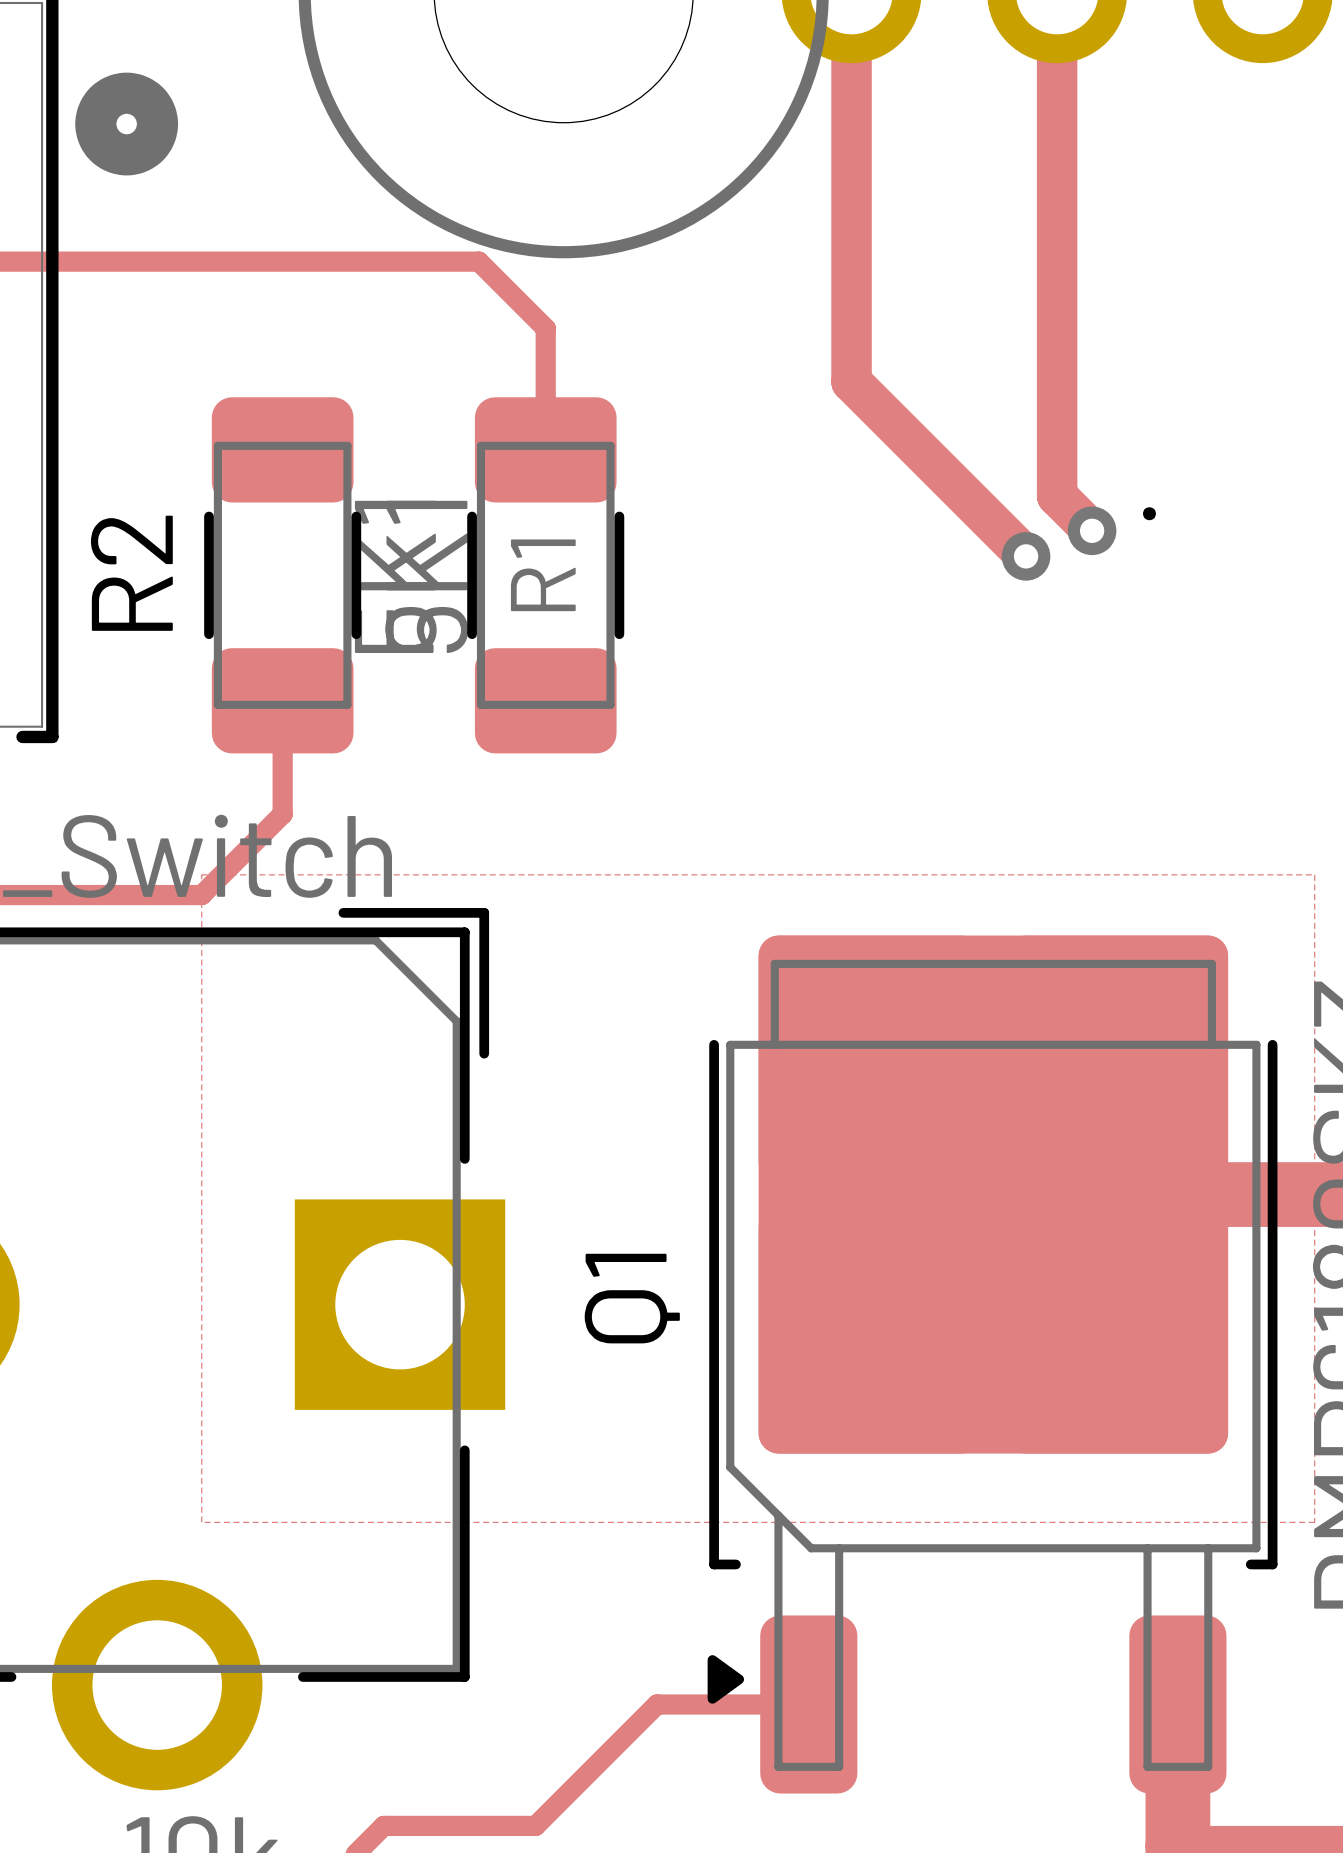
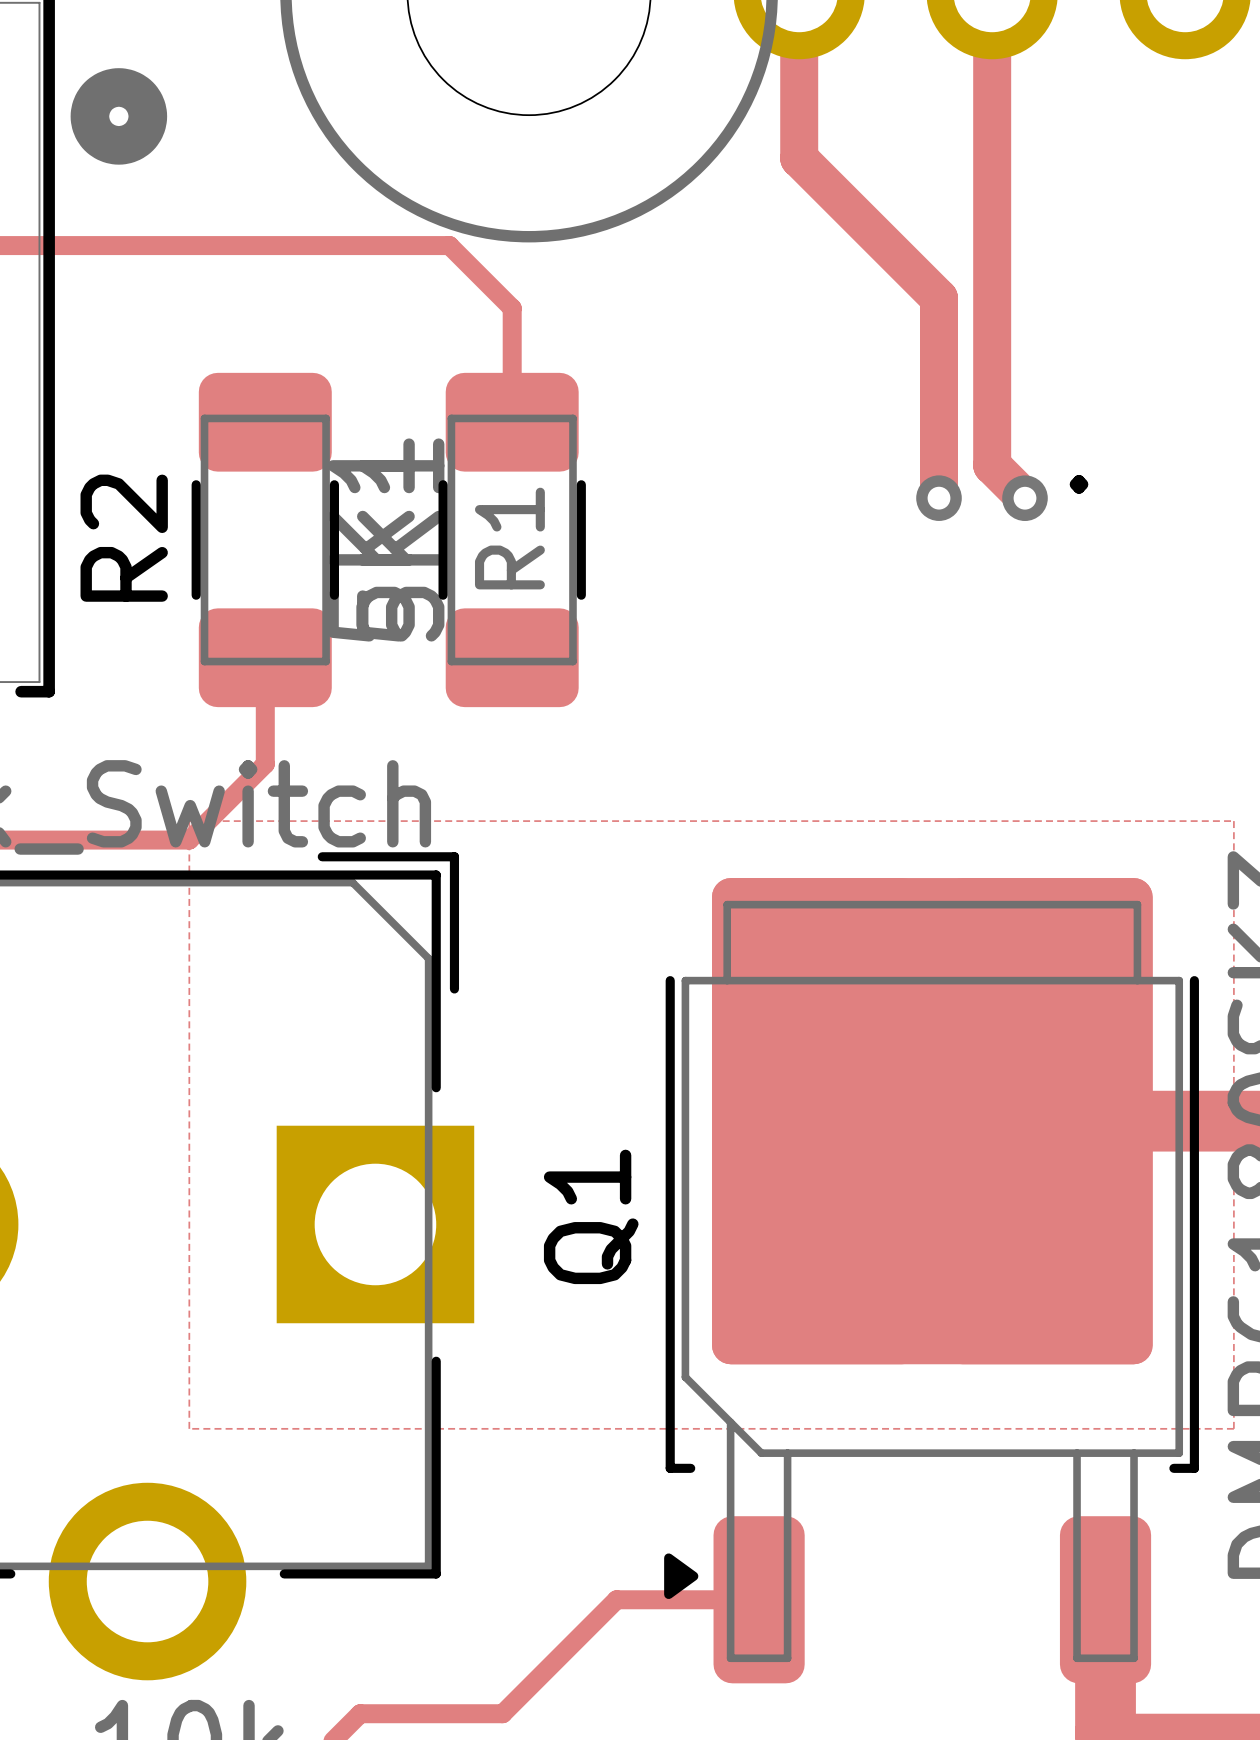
track: (851, 168) (851, 381) (1026, 556) -> (799, 158) (939, 298) (939, 498)
via position: (1026, 556) -> (939, 498)

